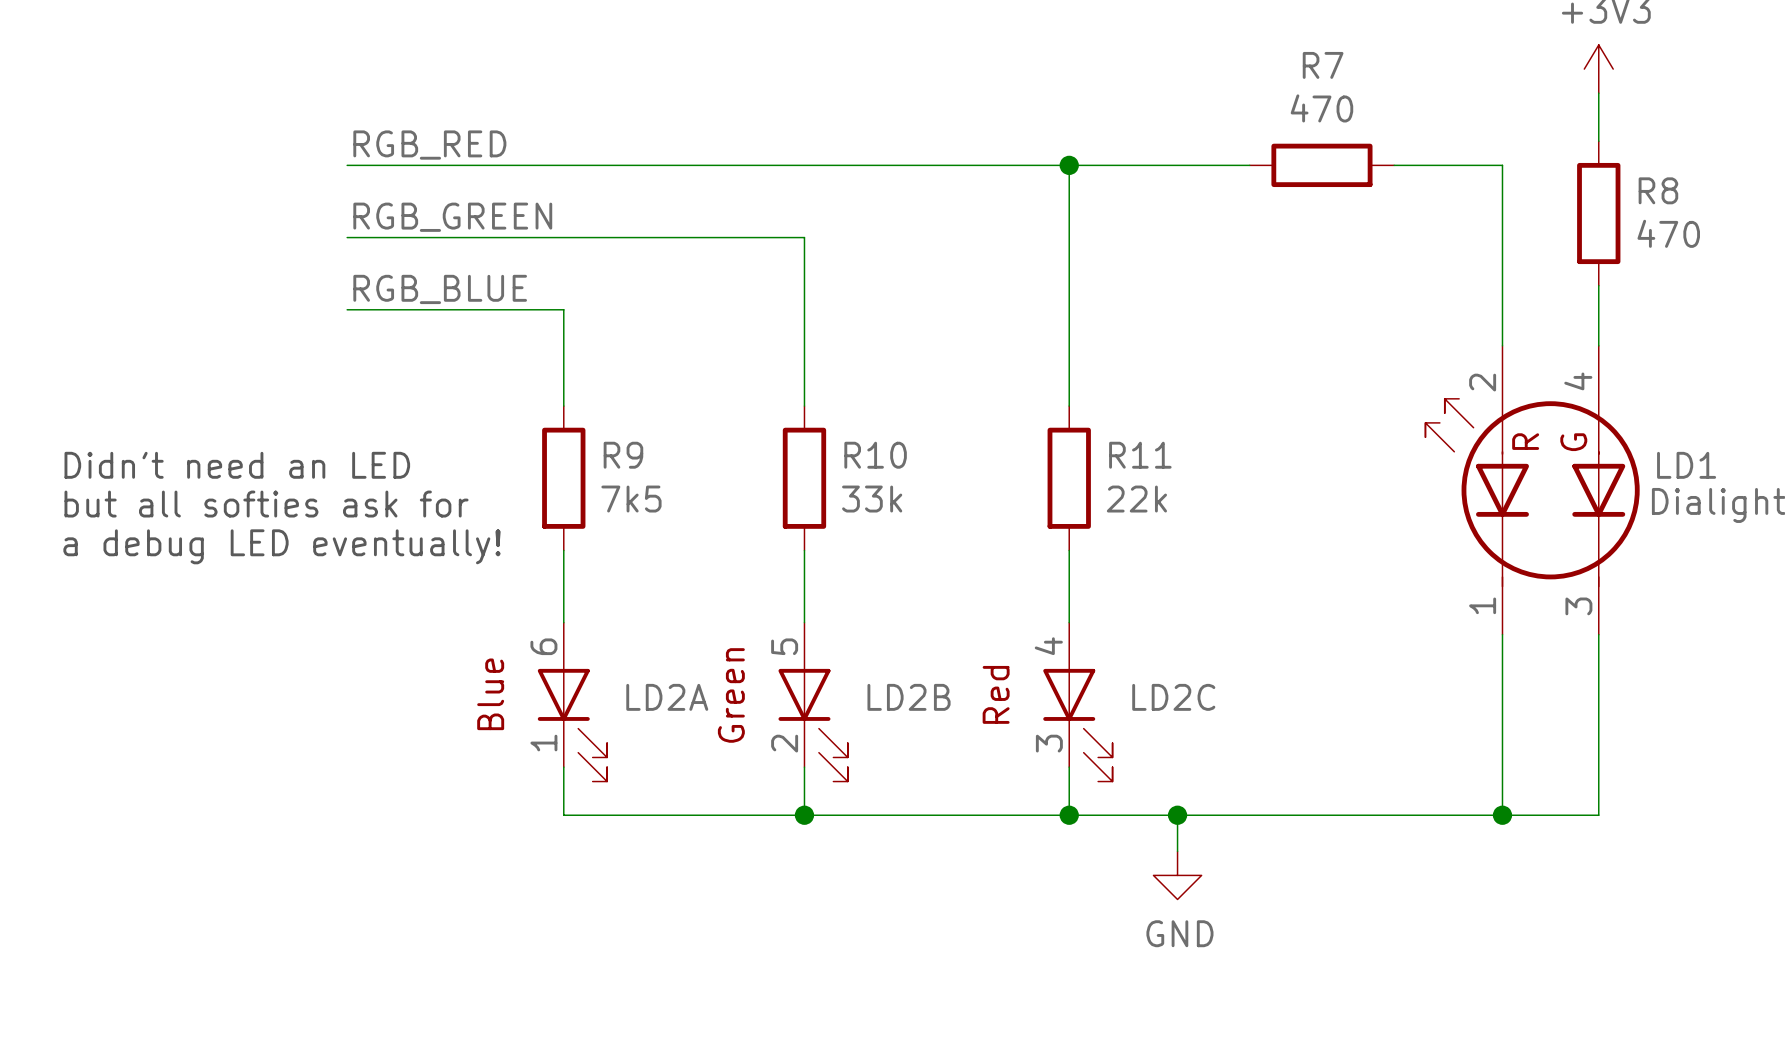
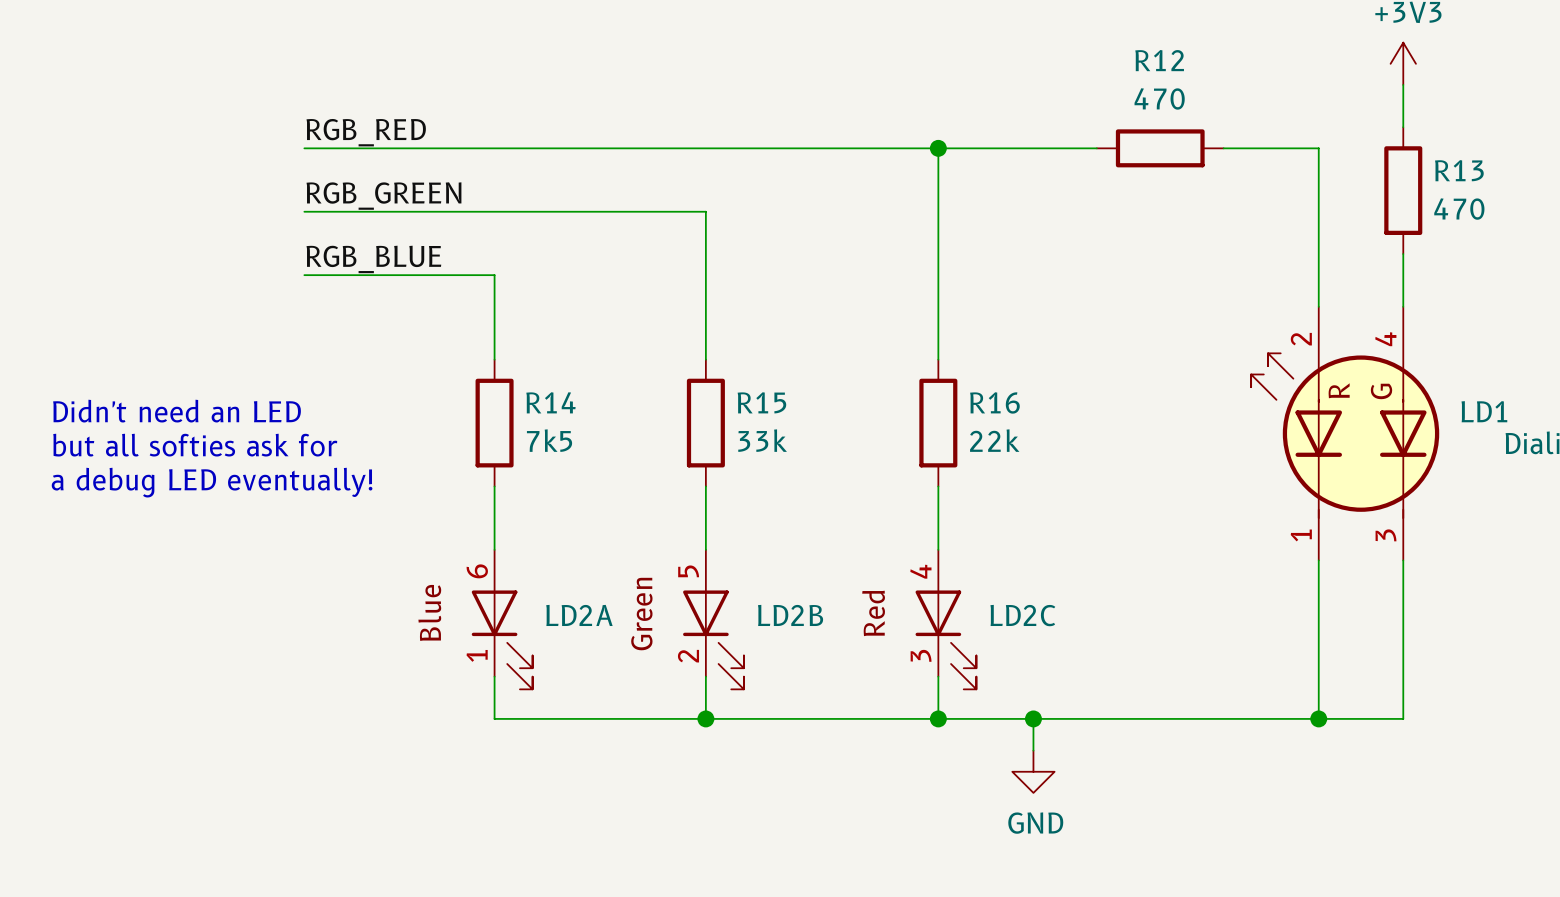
R7 name: R7 (1323, 65) -> R12 (1159, 60)
R8 name: R8 (1658, 190) -> R13 (1459, 170)
R9 name: R9 (623, 455) -> R14 (550, 402)
R10 name: R10 (875, 455) -> R15 (761, 402)
R11 name: R11 (1140, 455) -> R16 (994, 402)

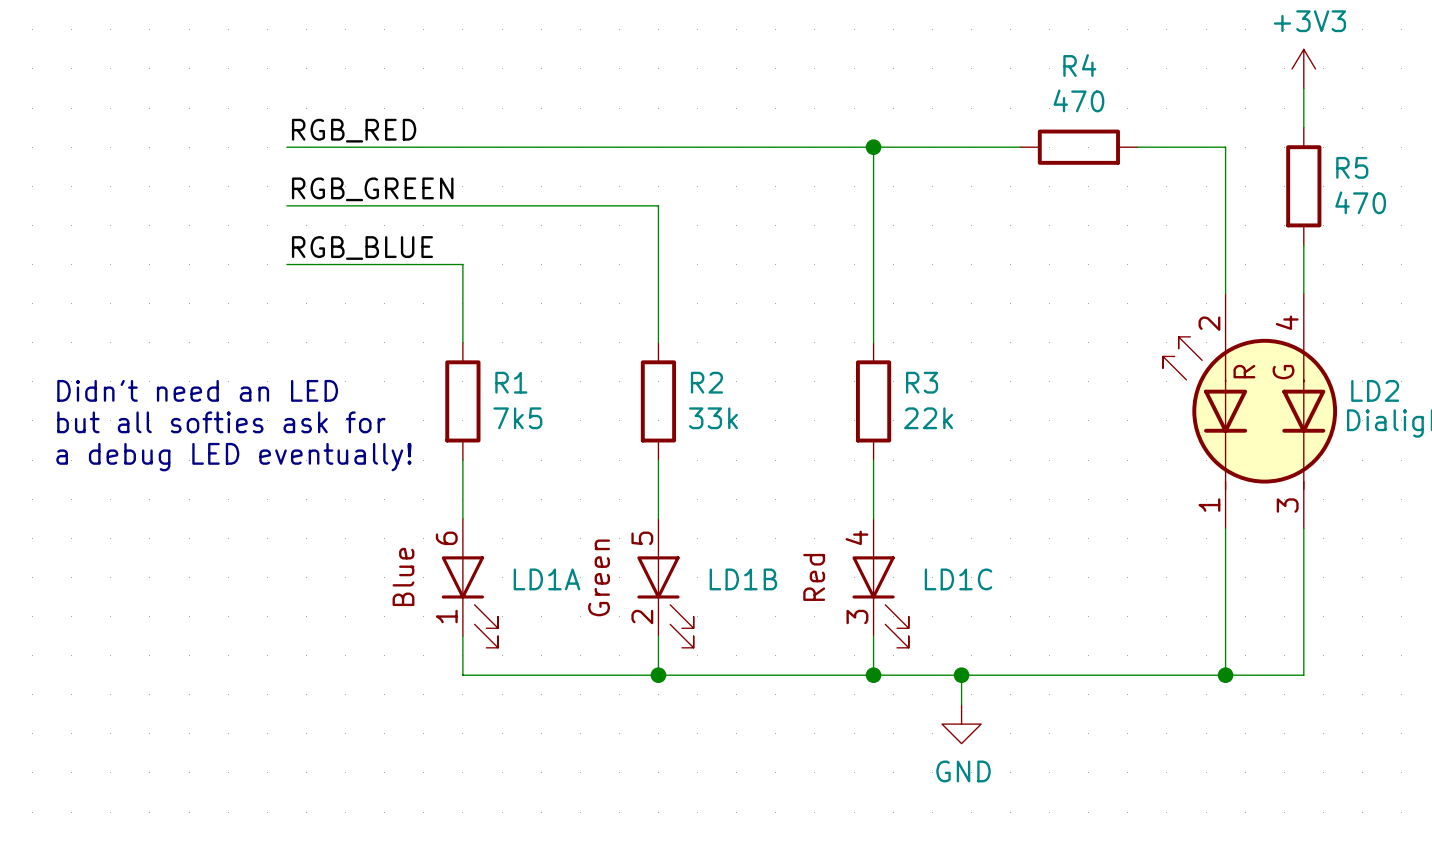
R12 name: R12 (1159, 60) -> R4 (1079, 65)
R13 name: R13 (1459, 170) -> R5 (1352, 167)
R14 name: R14 (550, 402) -> R1 (511, 382)
R15 name: R15 (761, 402) -> R2 (706, 382)
R16 name: R16 (994, 402) -> R3 (922, 382)
LD1 name: LD1 (1484, 411) -> LD2 (1375, 390)
LD2A name: LD2A (579, 615) -> LD1A (546, 579)
LD2B name: LD2B (790, 615) -> LD1B (743, 579)
LD2C name: LD2C (1022, 615) -> LD1C (958, 579)

